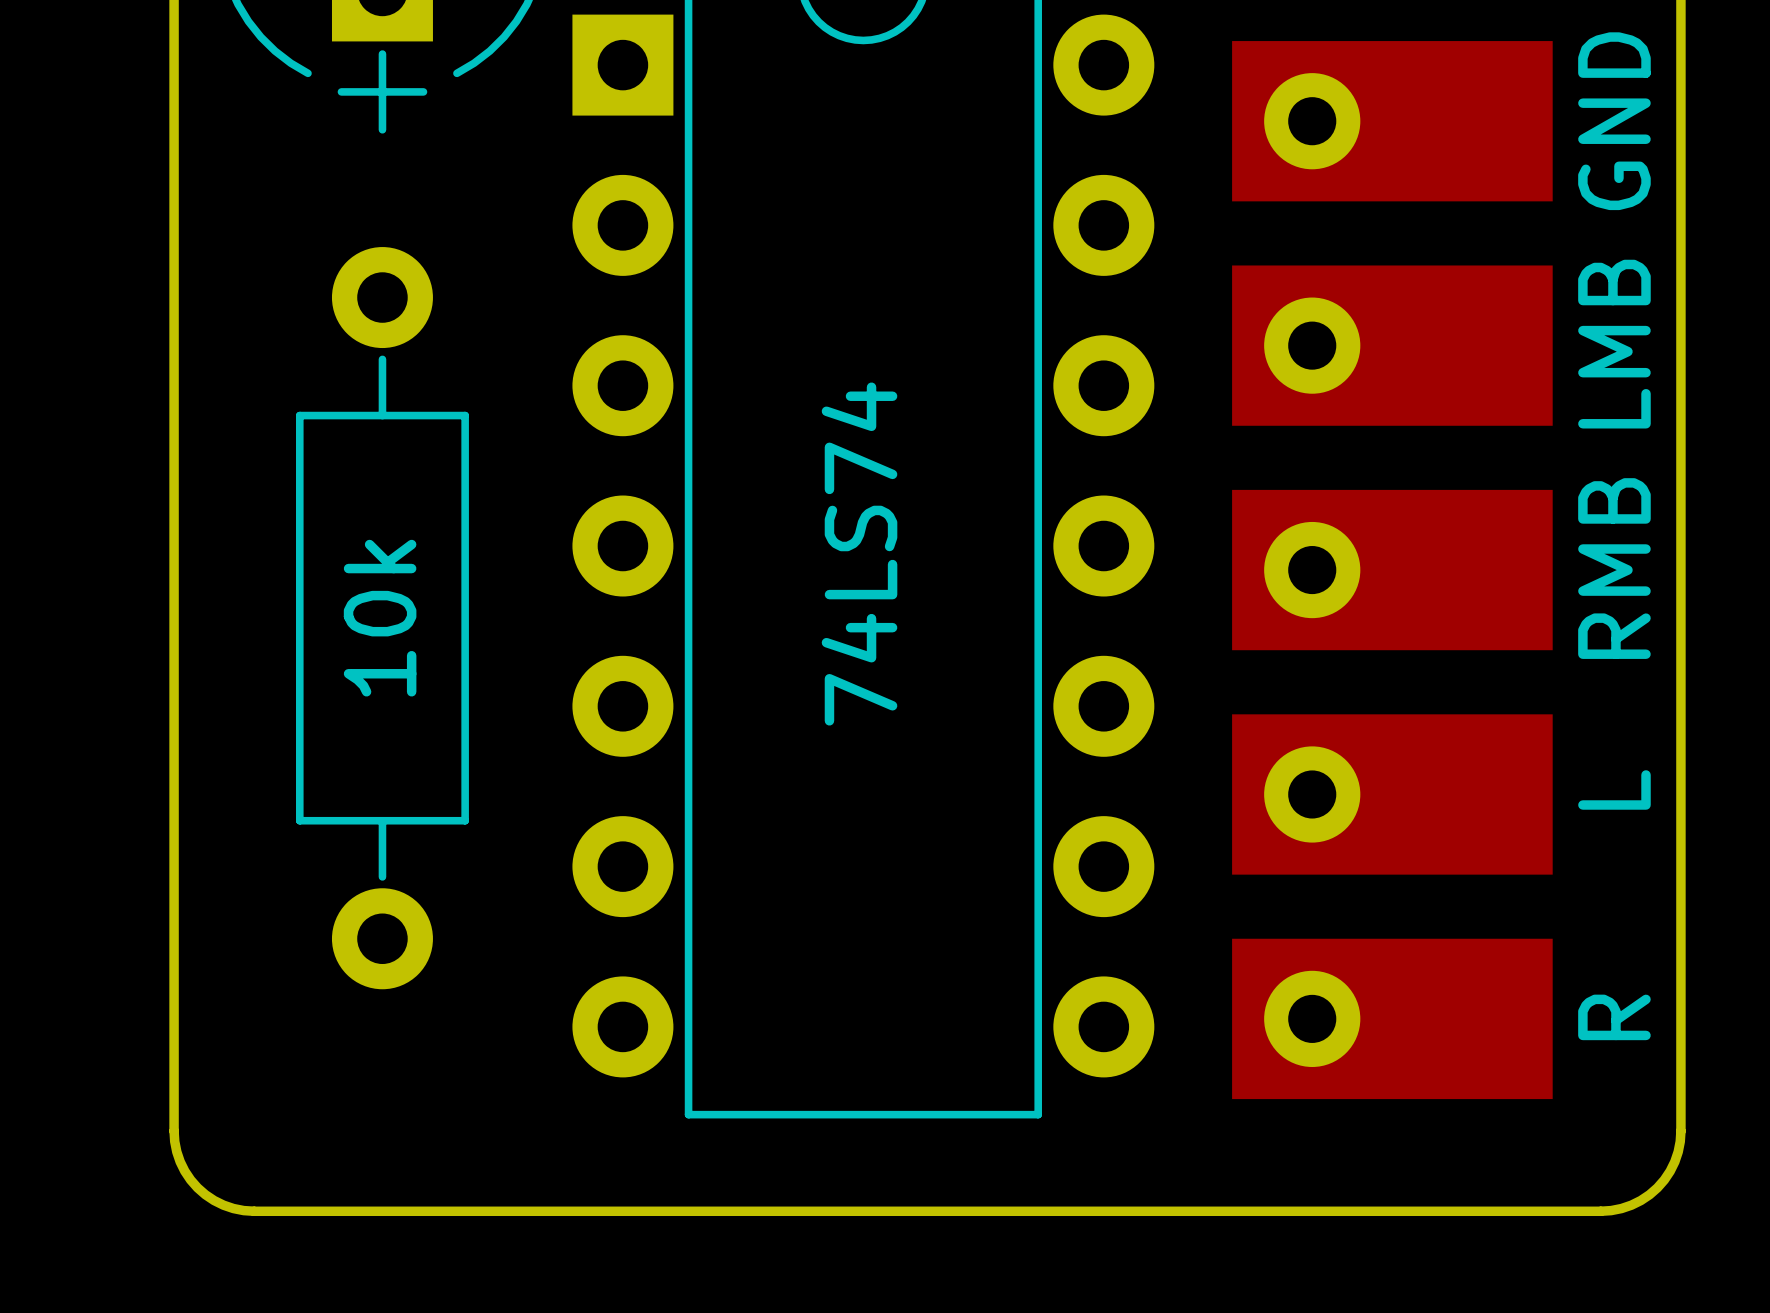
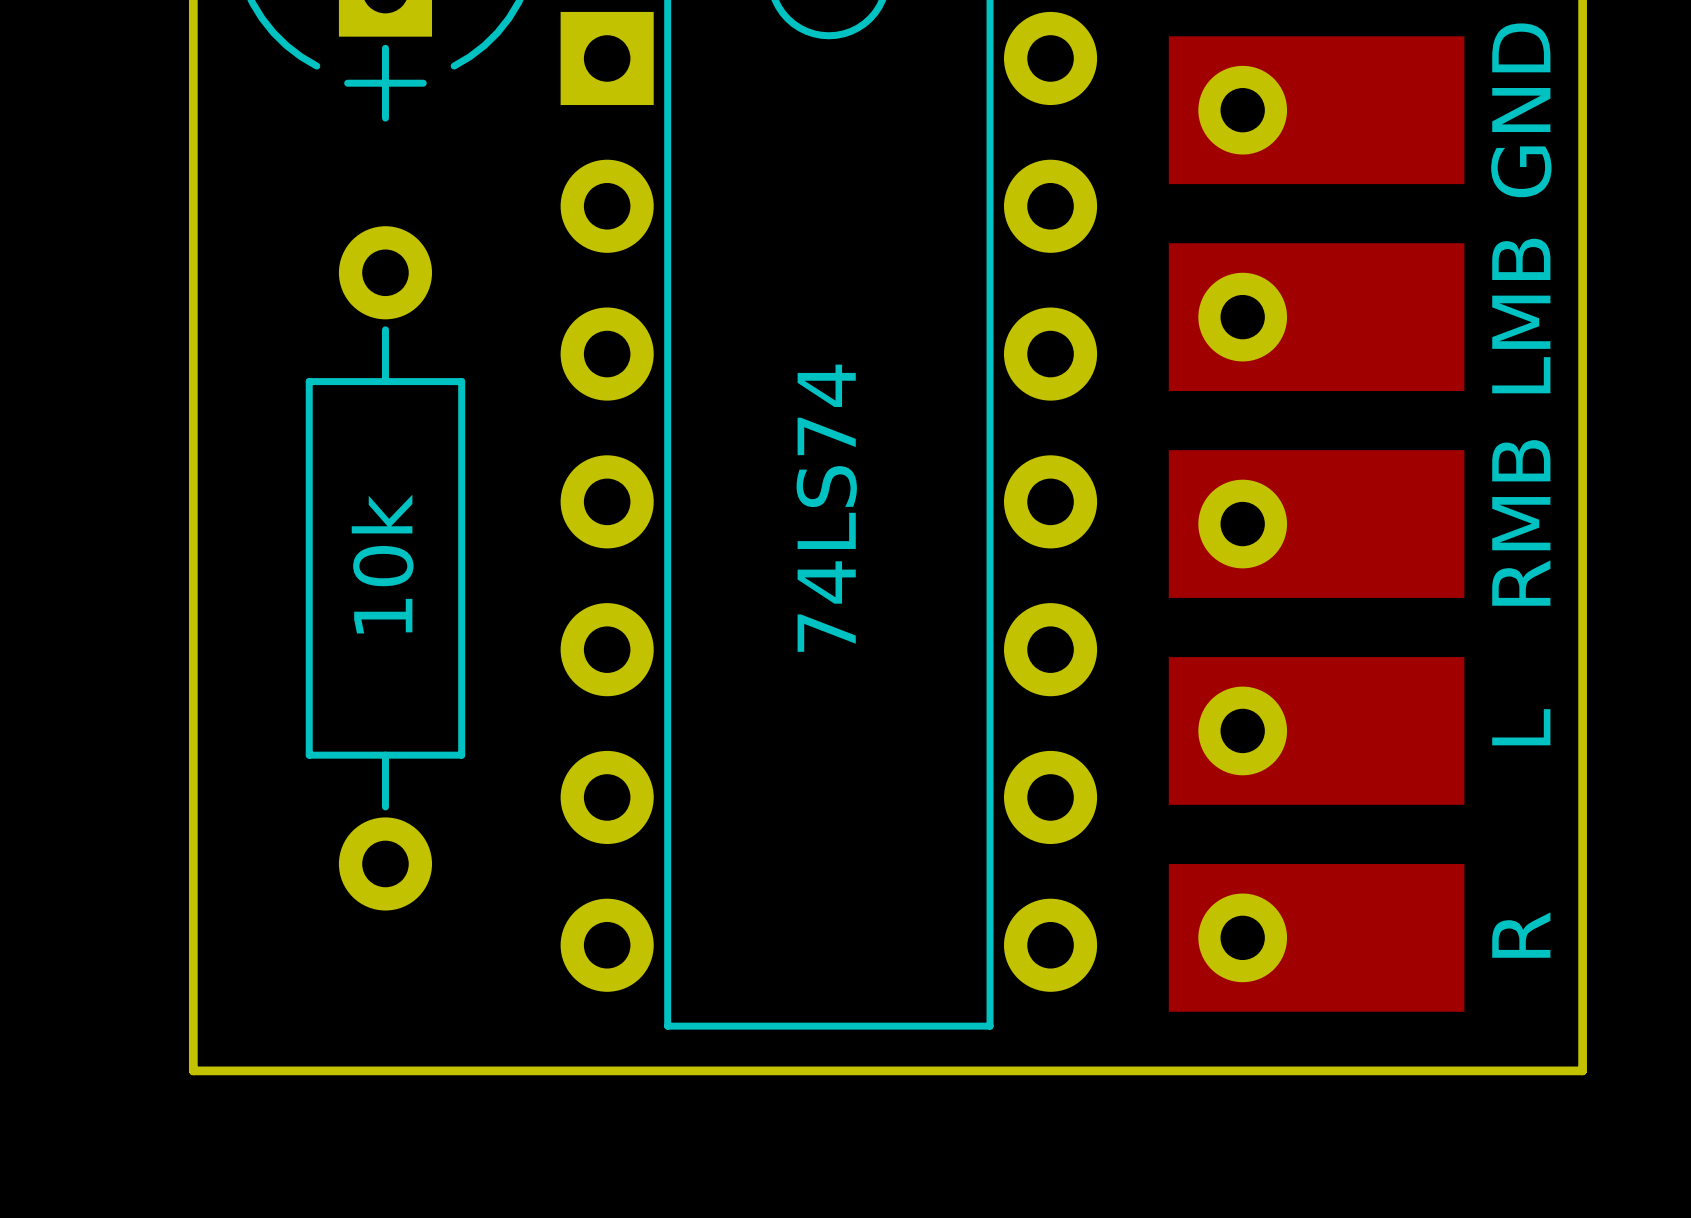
board edge: (174, 1131) (180, 1161) (197, 1187) (223, 1205) (254, 1211) (1600, 1211) (1631, 1205) (1657, 1187) (1674, 1161) (1680, 1131) -> (193, 1041) (193, 1070) (1582, 1070) (1582, 1041)

